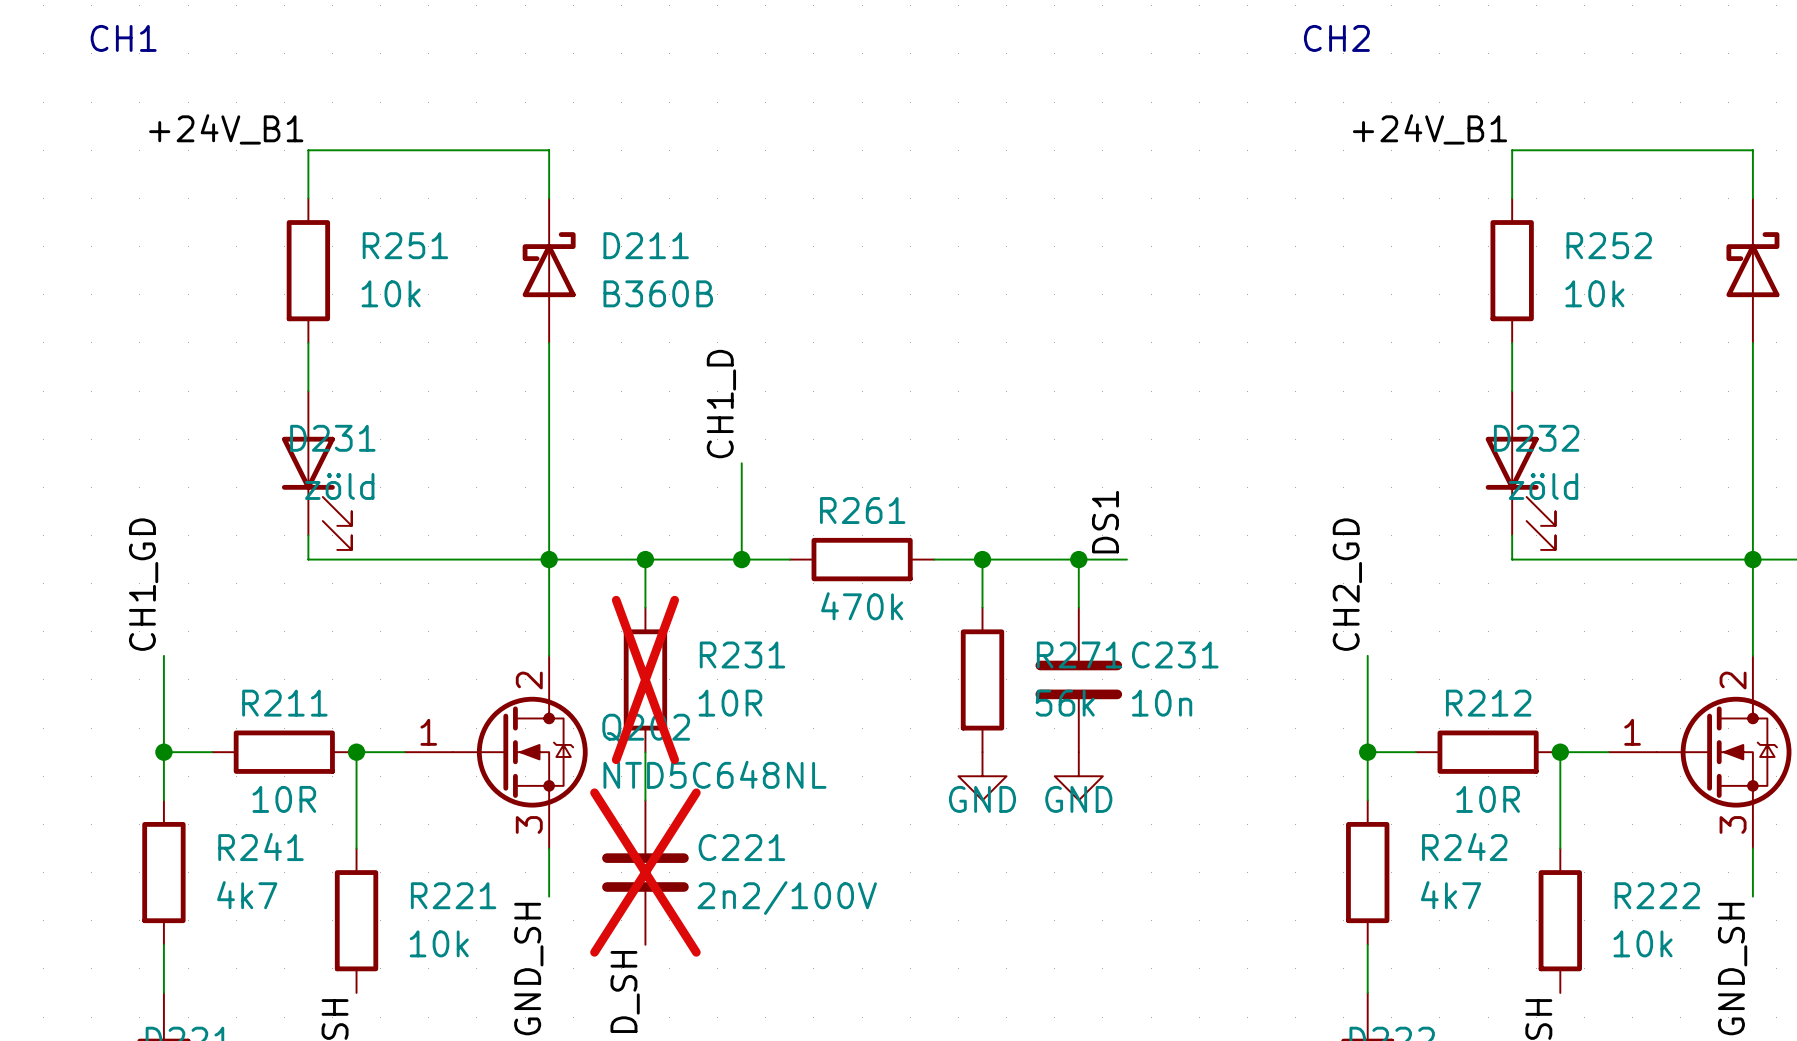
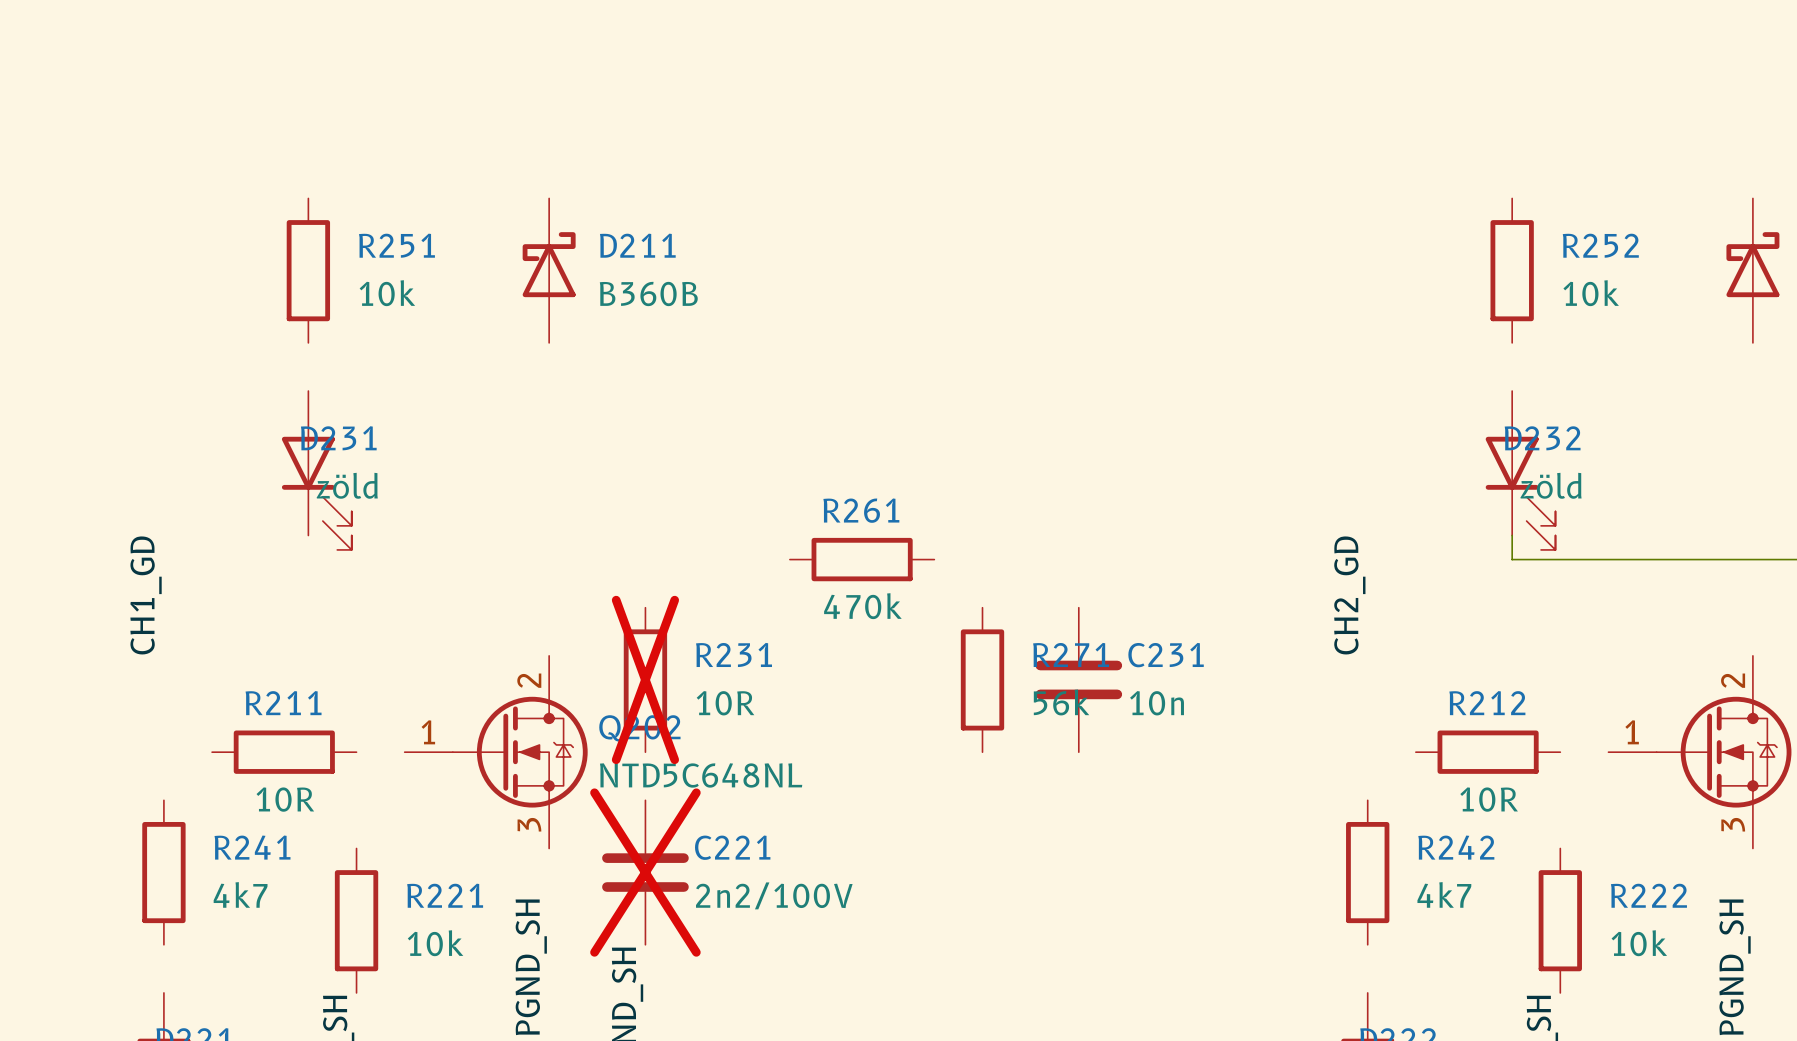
text: CH1 (123, 38) -> none
text: CH2 (1336, 38) -> none
label: +24V_B1 (226, 129) -> none
label: +24V_B1 (1430, 129) -> none
wire: (308, 198) (308, 150) (549, 150) (549, 198) -> none
wire: (1512, 198) (1512, 150) (1752, 150) (1752, 198) -> none
wire: (308, 342) (308, 391) -> none
wire: (549, 342) (549, 655) -> none
wire: (1512, 342) (1512, 391) -> none
wire: (1752, 342) (1752, 655) -> none
label: CH1_D (721, 404) -> none
wire: (741, 463) (741, 559) -> none
label: DS1 (1105, 522) -> none
wire: (308, 535) (308, 559) (789, 559) -> none
junction: (549, 559) -> none
wire: (645, 559) (645, 607) -> none
junction: (645, 559) -> none
junction: (741, 559) -> none
wire: (934, 559) (1126, 559) -> none
wire: (982, 559) (982, 607) -> none
junction: (982, 559) -> none
wire: (1078, 559) (1078, 607) -> none
junction: (1078, 559) -> none
junction: (1752, 559) -> none
wire: (163, 655) (163, 800) -> none
wire: (1367, 655) (1367, 800) -> none
wire: (163, 752) (212, 752) -> none
junction: (163, 752) -> none
junction: (356, 752) -> none
wire: (404, 752) (356, 752) (356, 848) -> none
wire: (645, 752) (645, 800) -> none
wire: (1367, 752) (1415, 752) -> none
junction: (1367, 752) -> none
junction: (1560, 752) -> none
wire: (1608, 752) (1560, 752) (1560, 848) -> none
power symbol: GND (982, 776) -> none
power symbol: GND (1078, 776) -> none
wire: (549, 848) (549, 896) -> none
wire: (1752, 848) (1752, 896) -> none
wire: (163, 944) (163, 992) -> none
wire: (1367, 944) (1367, 992) -> none

